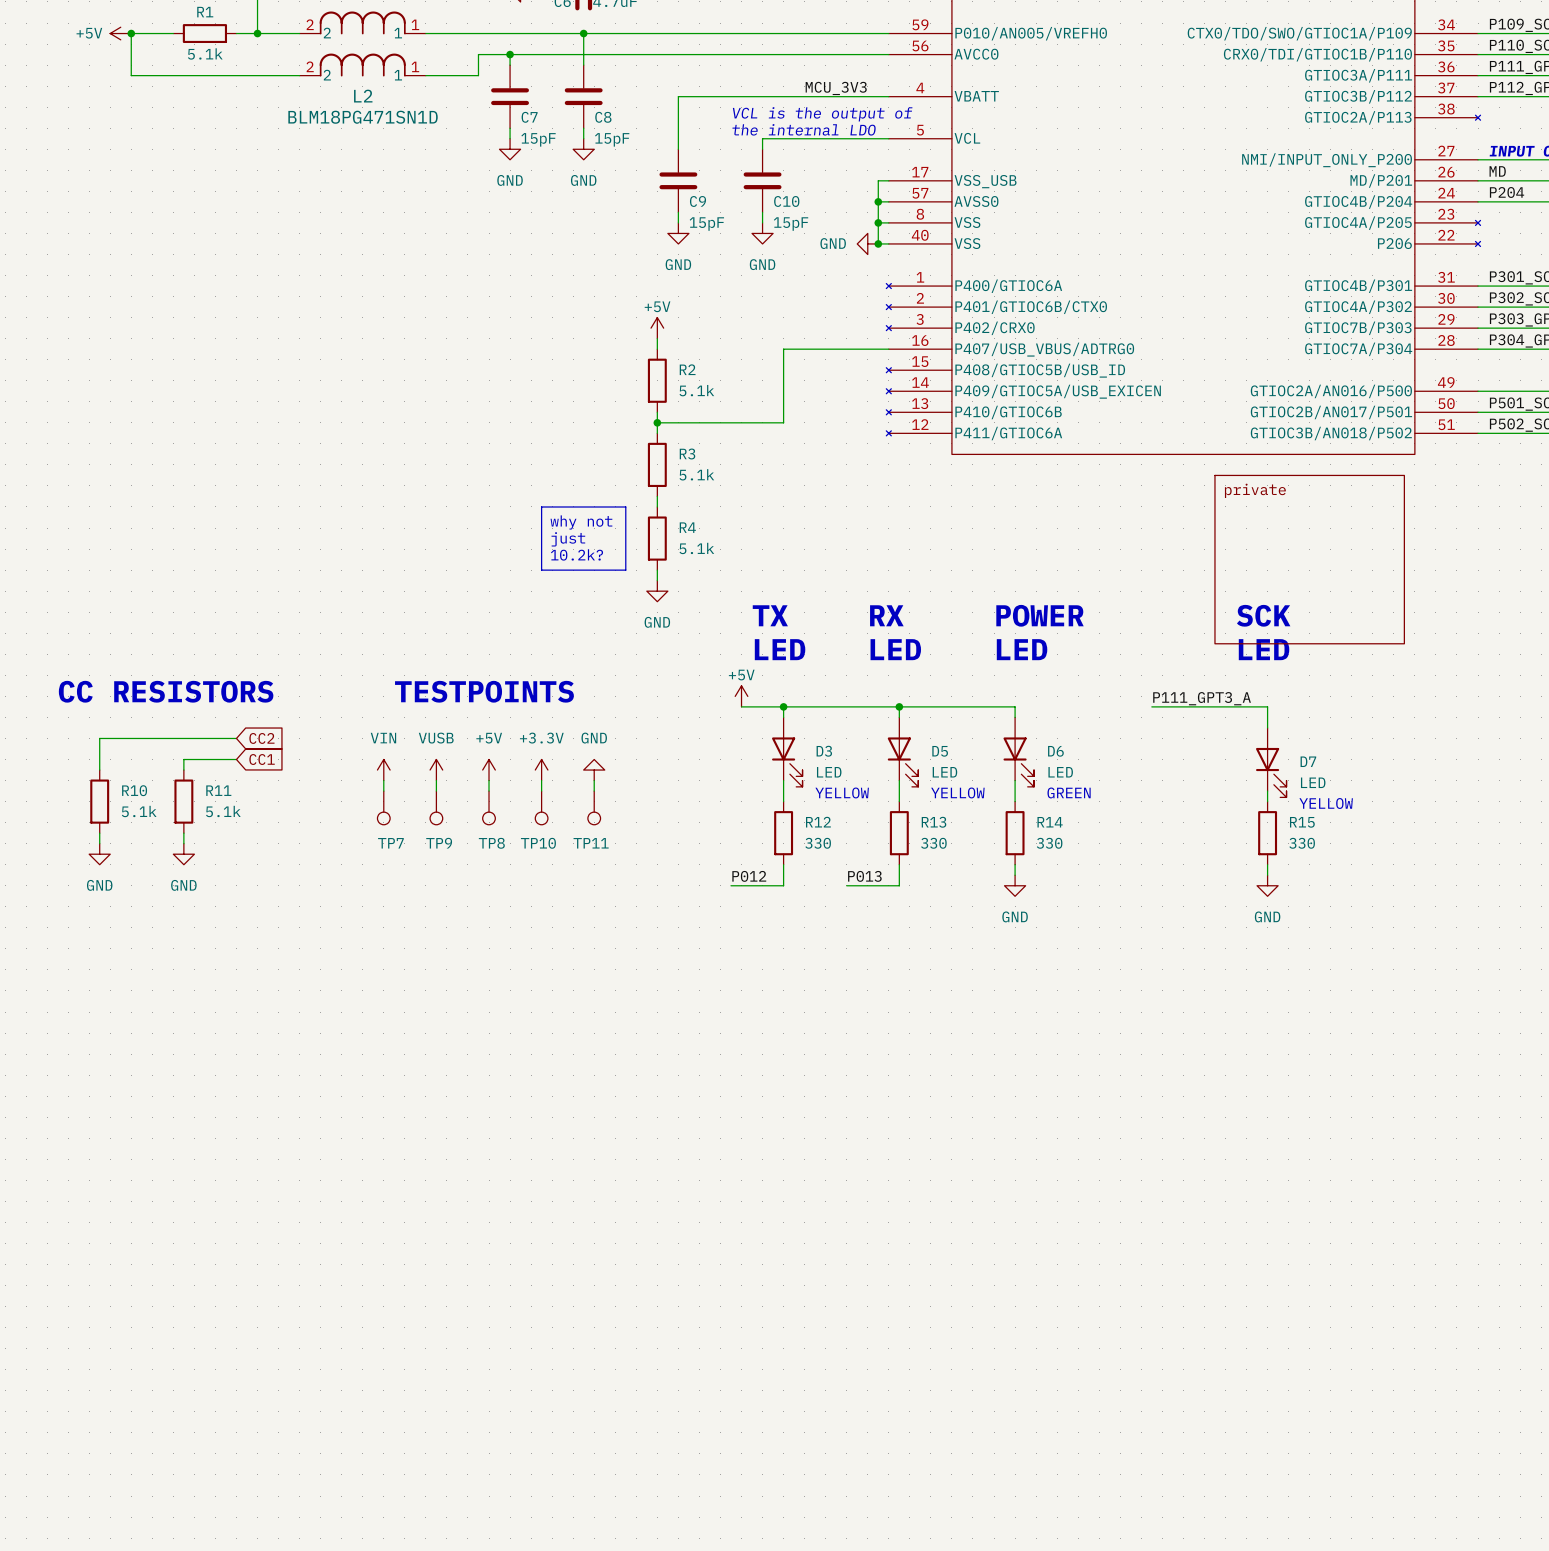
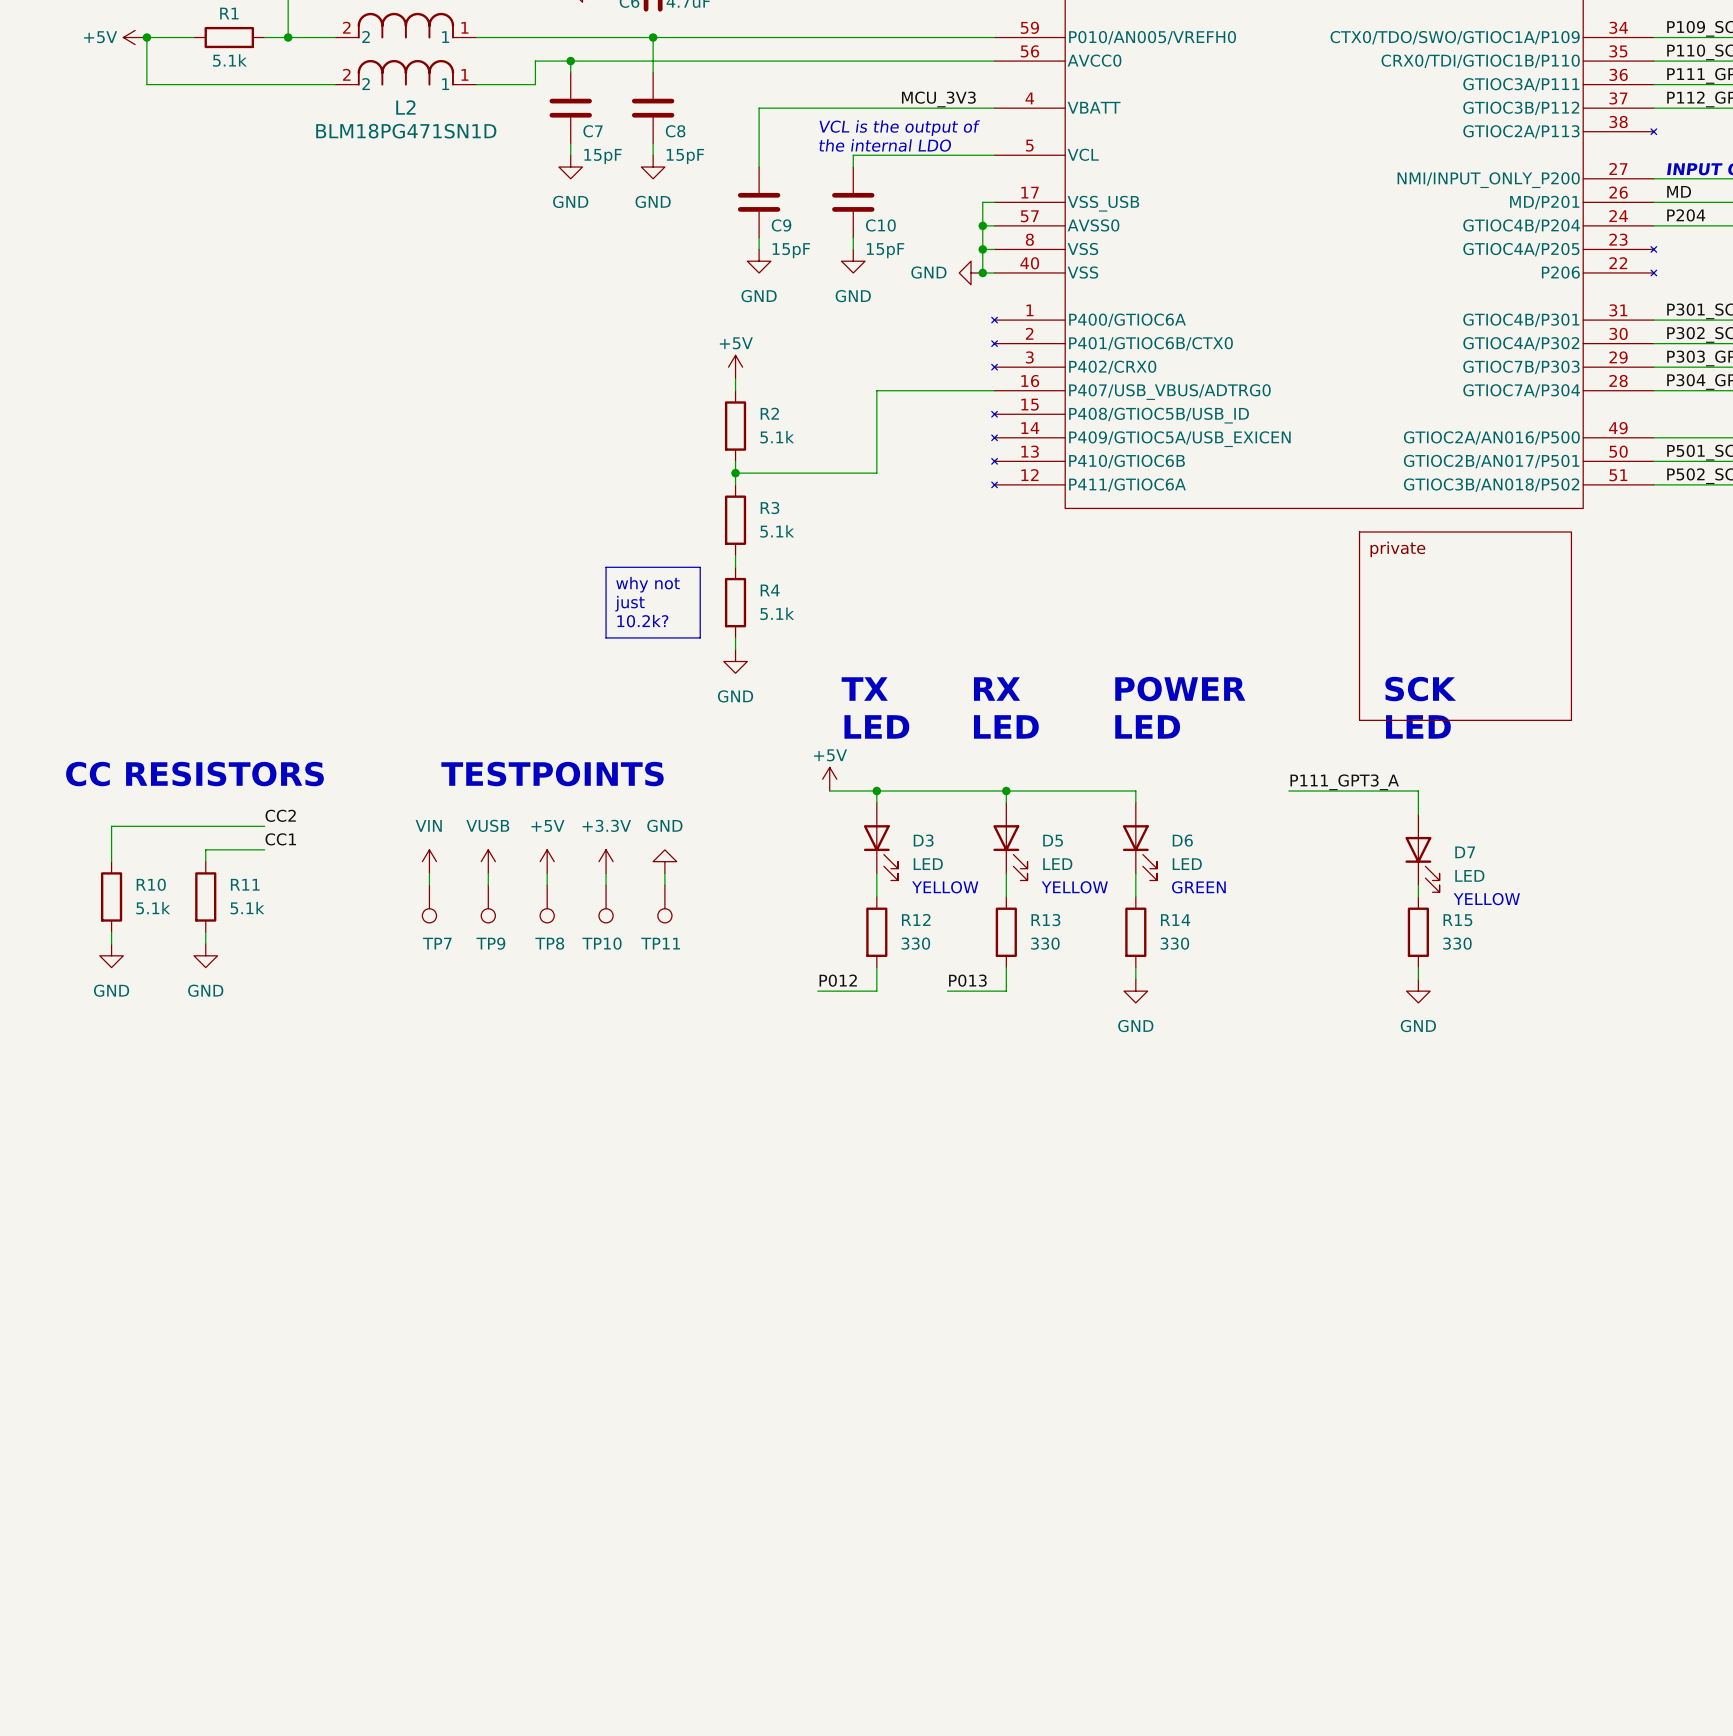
label: none -> CC2 (280, 815)
global label: CC2 (261, 738) -> none
label: none -> CC1 (280, 839)
global label: CC1 (262, 759) -> none

